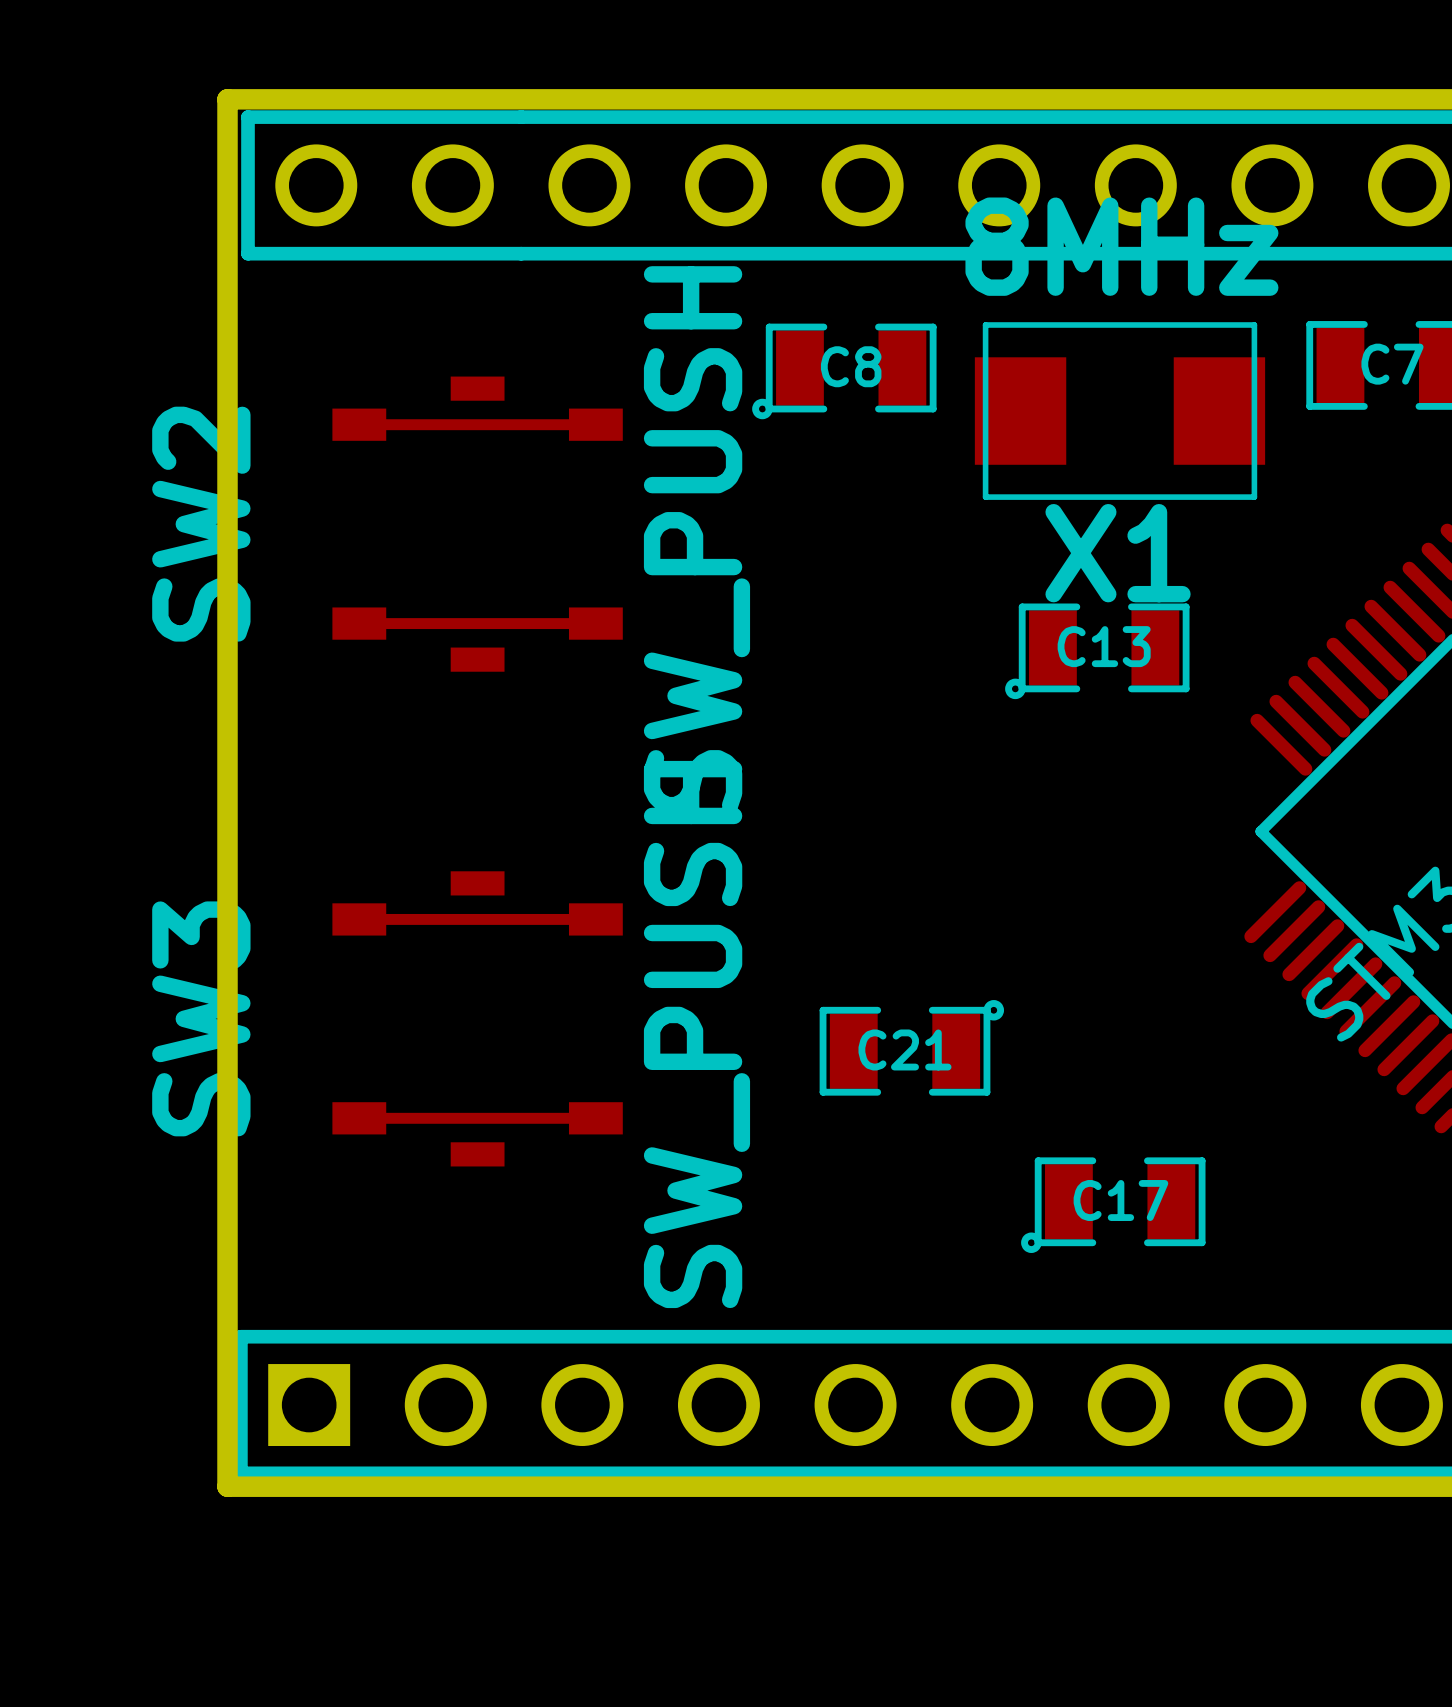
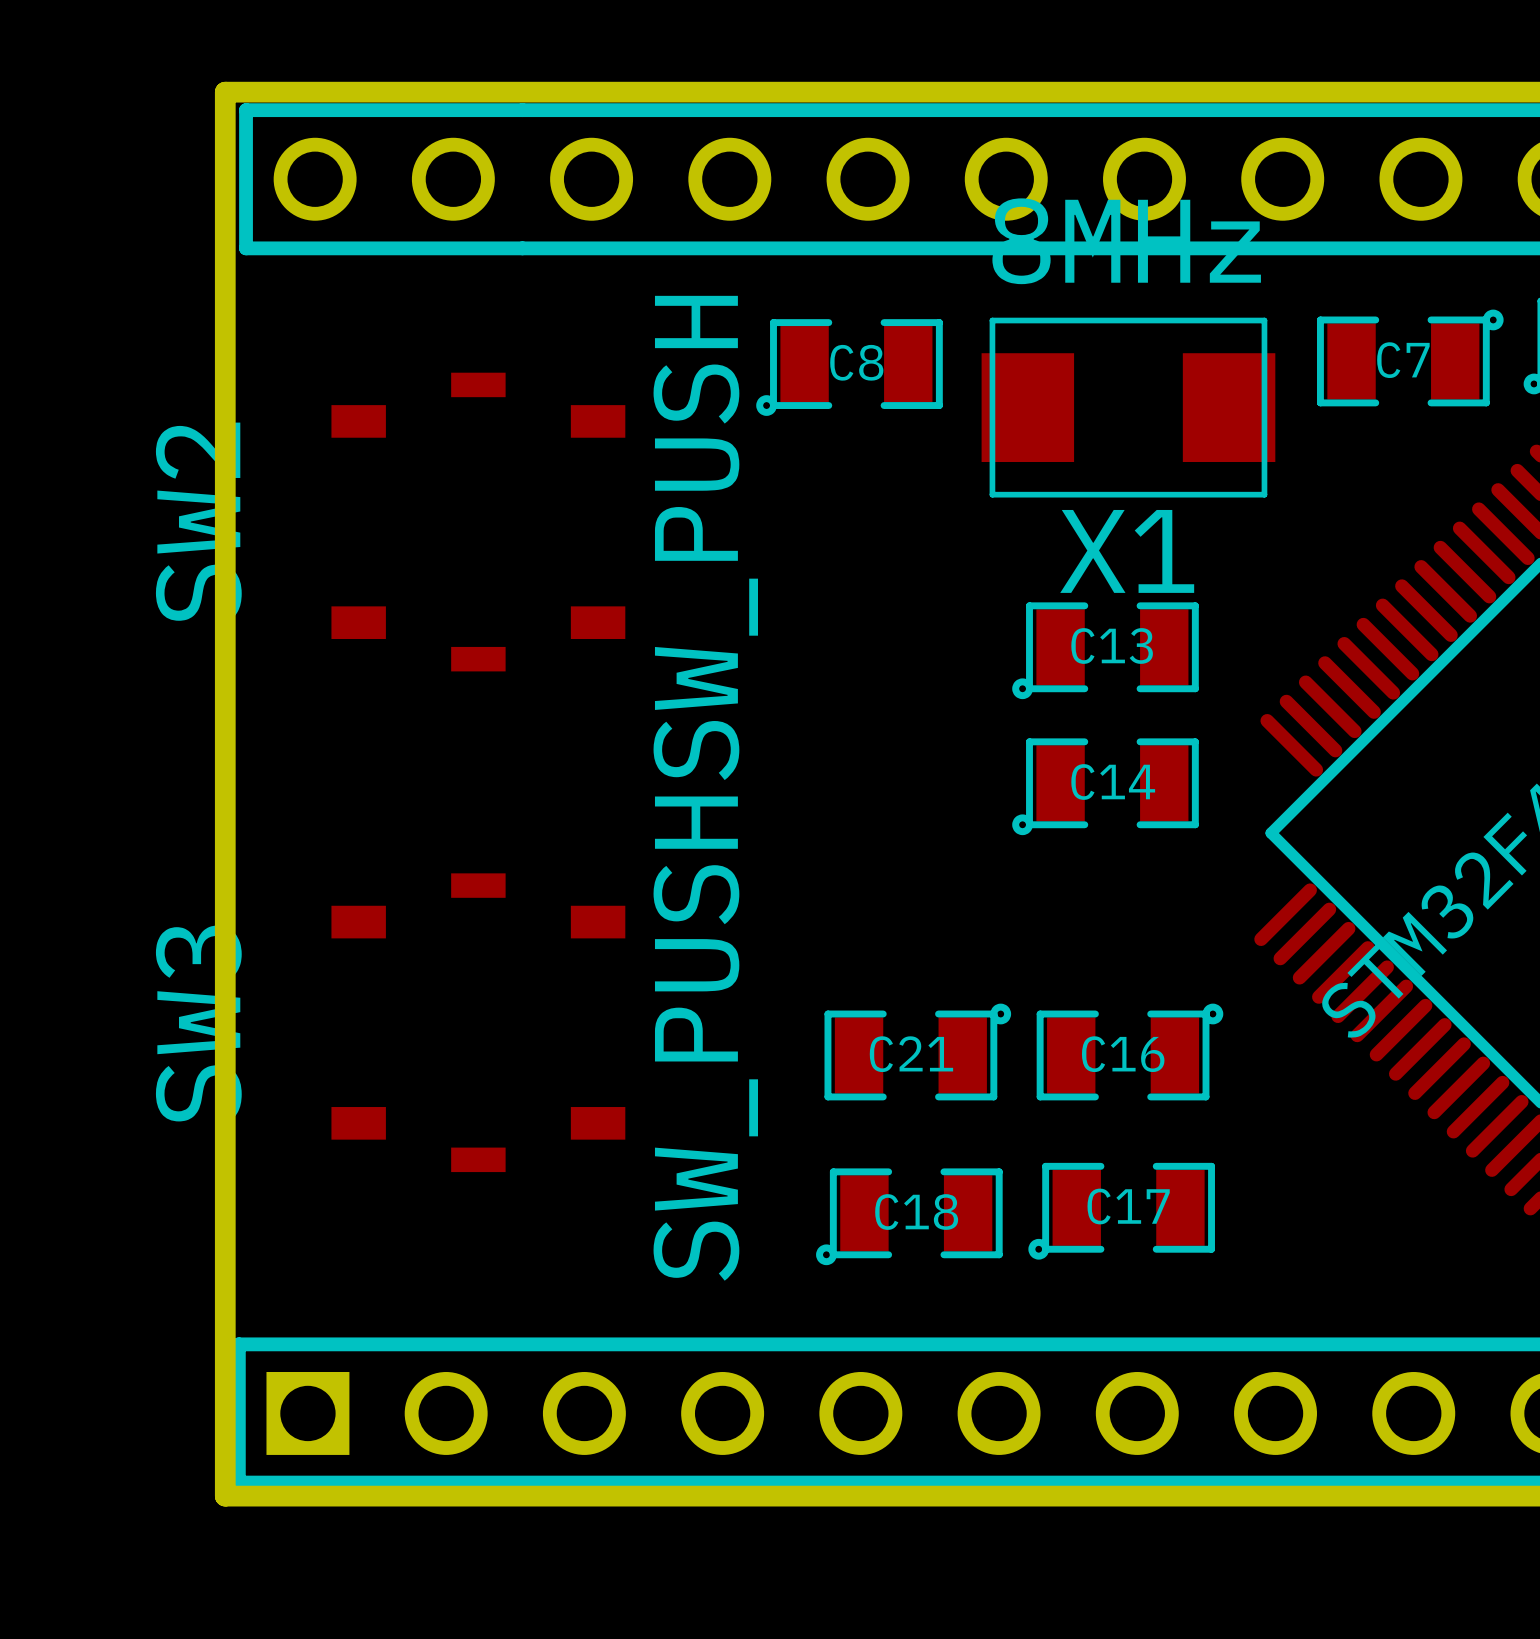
track: (359, 424) (595, 424) -> none
track: (359, 623) (595, 623) -> none
C14: none -> (1105, 786)
track: (359, 919) (595, 919) -> none
C16: none -> (1129, 1052)
track: (359, 1118) (595, 1118) -> none
C18: none -> (909, 1216)

